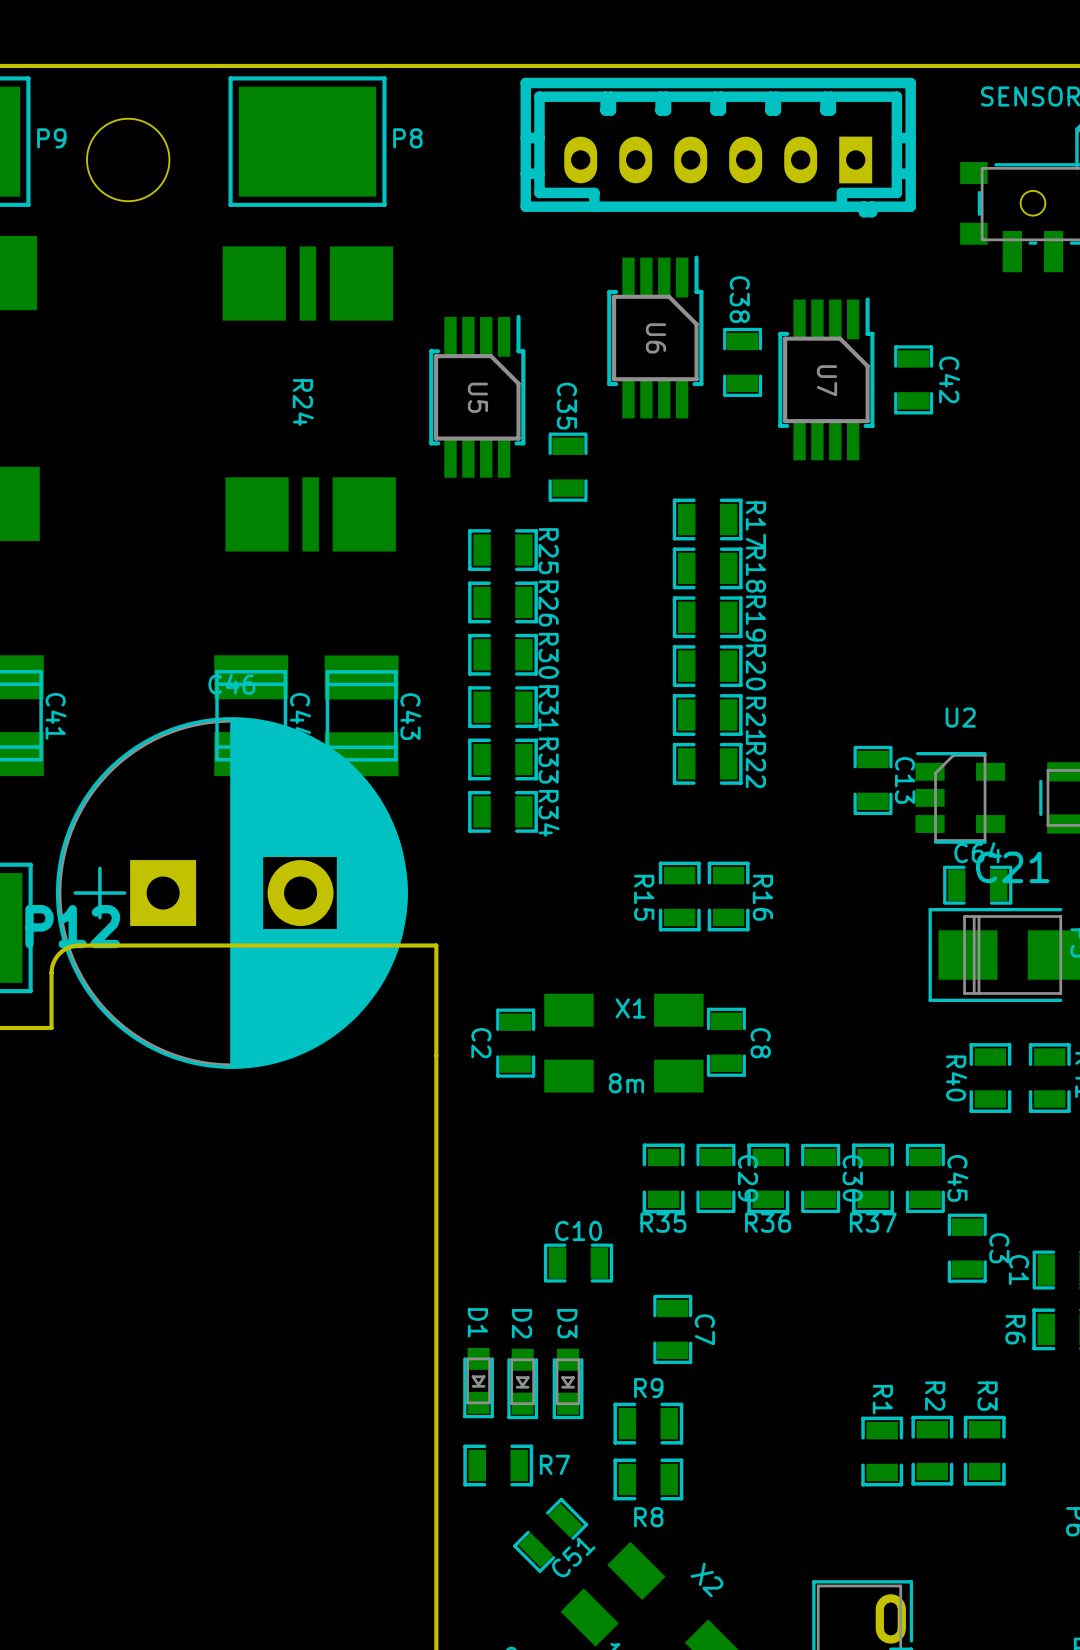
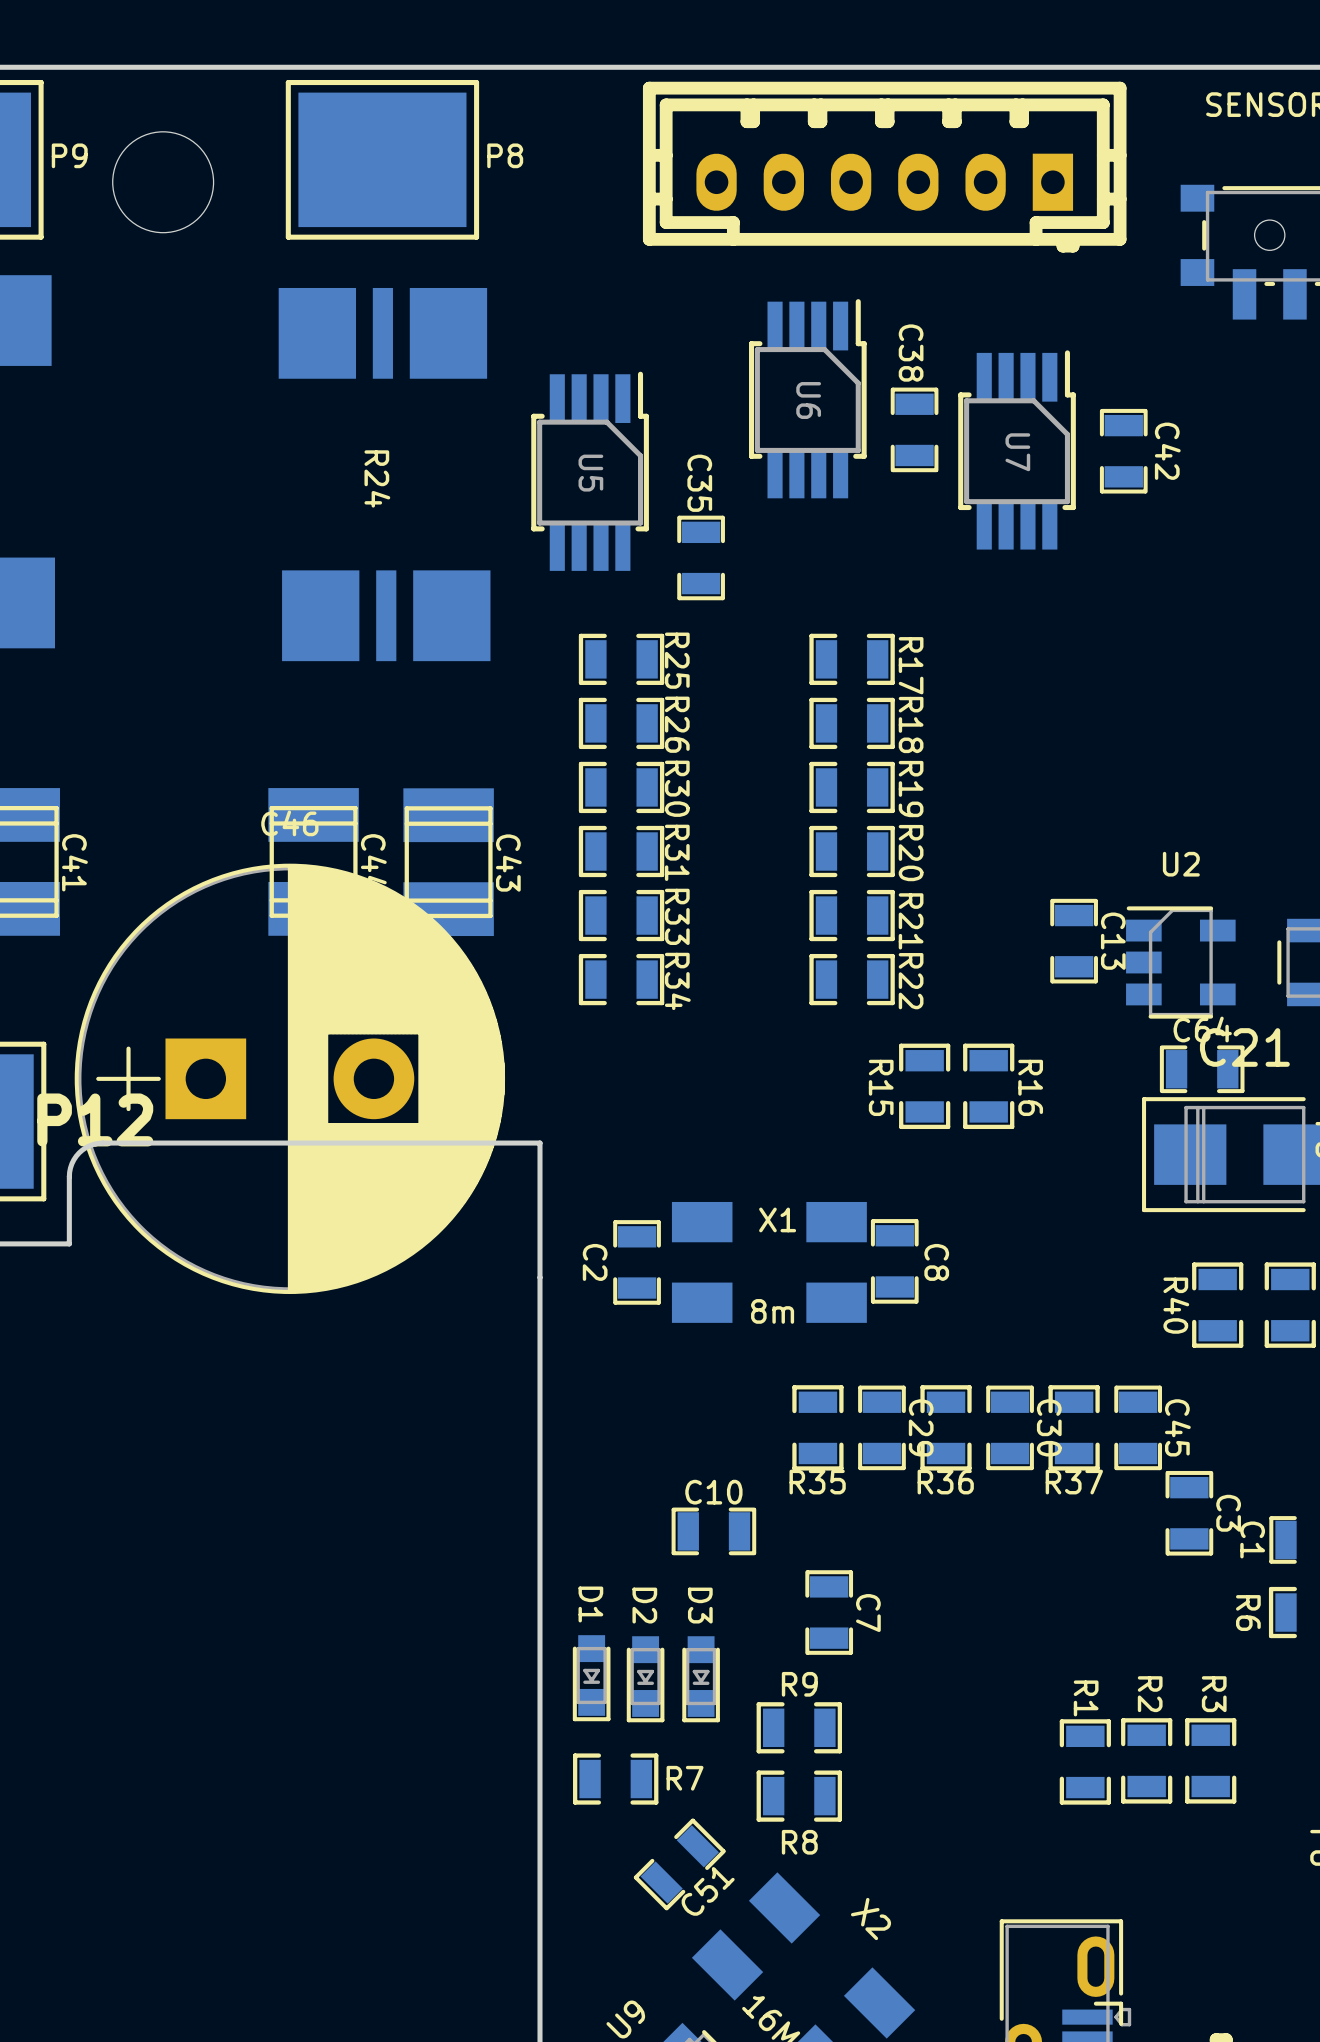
R17 position: (707, 519) -> (852, 659)
R18 position: (707, 568) -> (852, 723)
R19 position: (707, 617) -> (852, 787)
R20 position: (707, 666) -> (852, 851)
R21 position: (707, 715) -> (852, 915)
R22 position: (707, 763) -> (852, 979)
R15 position: (679, 896) -> (924, 1086)
R16 position: (728, 896) -> (988, 1086)

